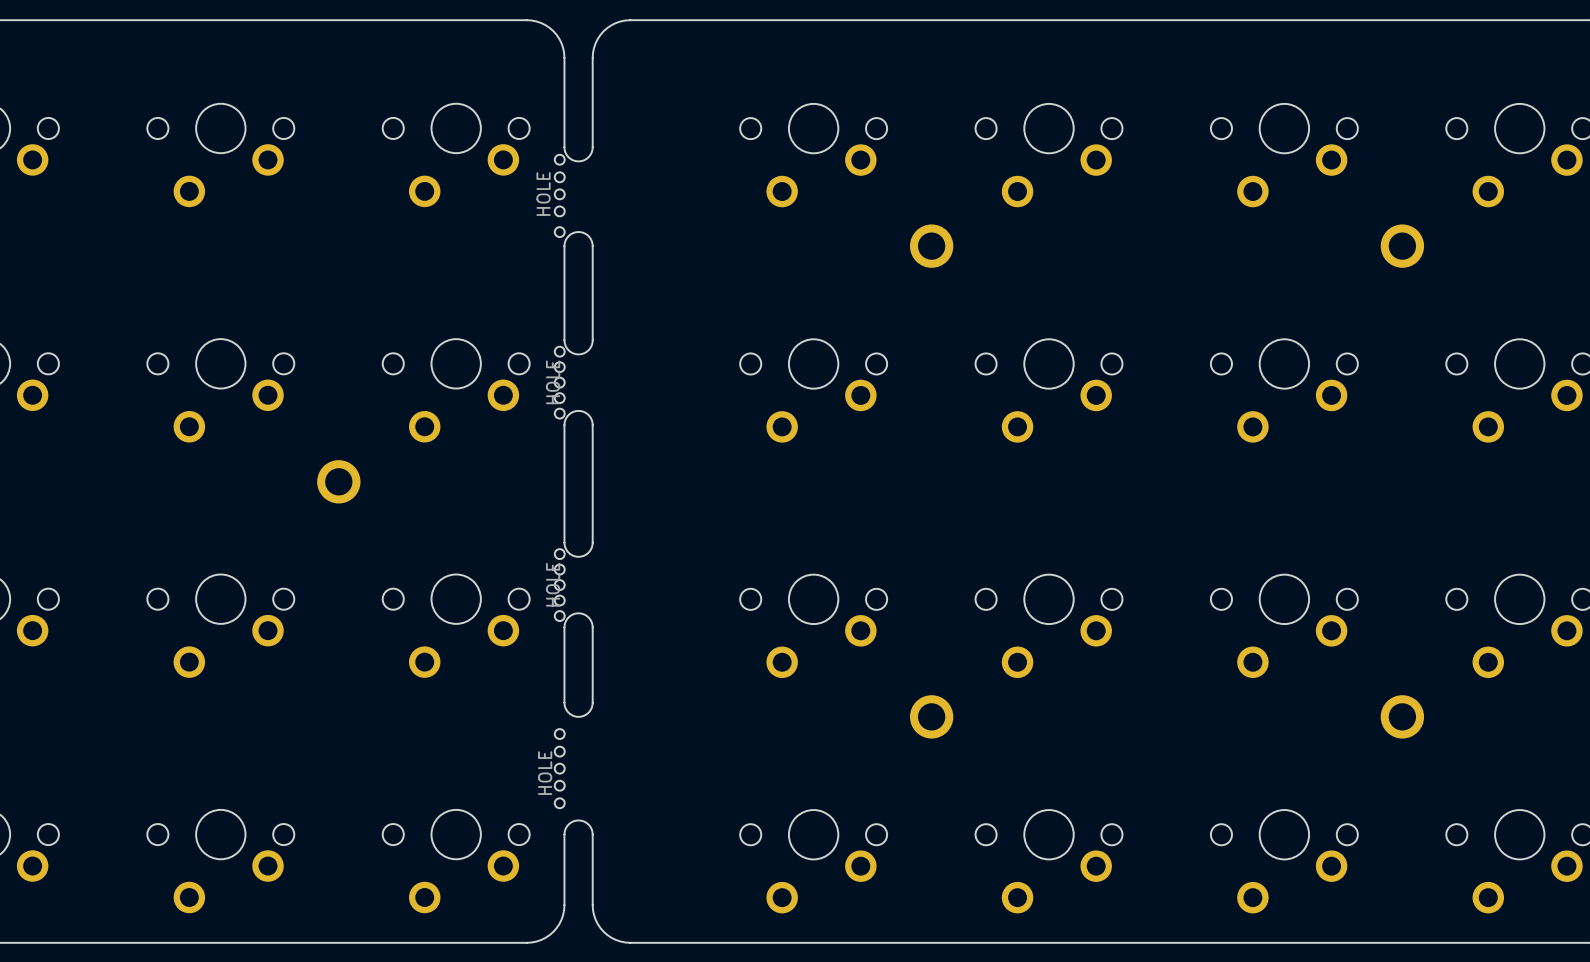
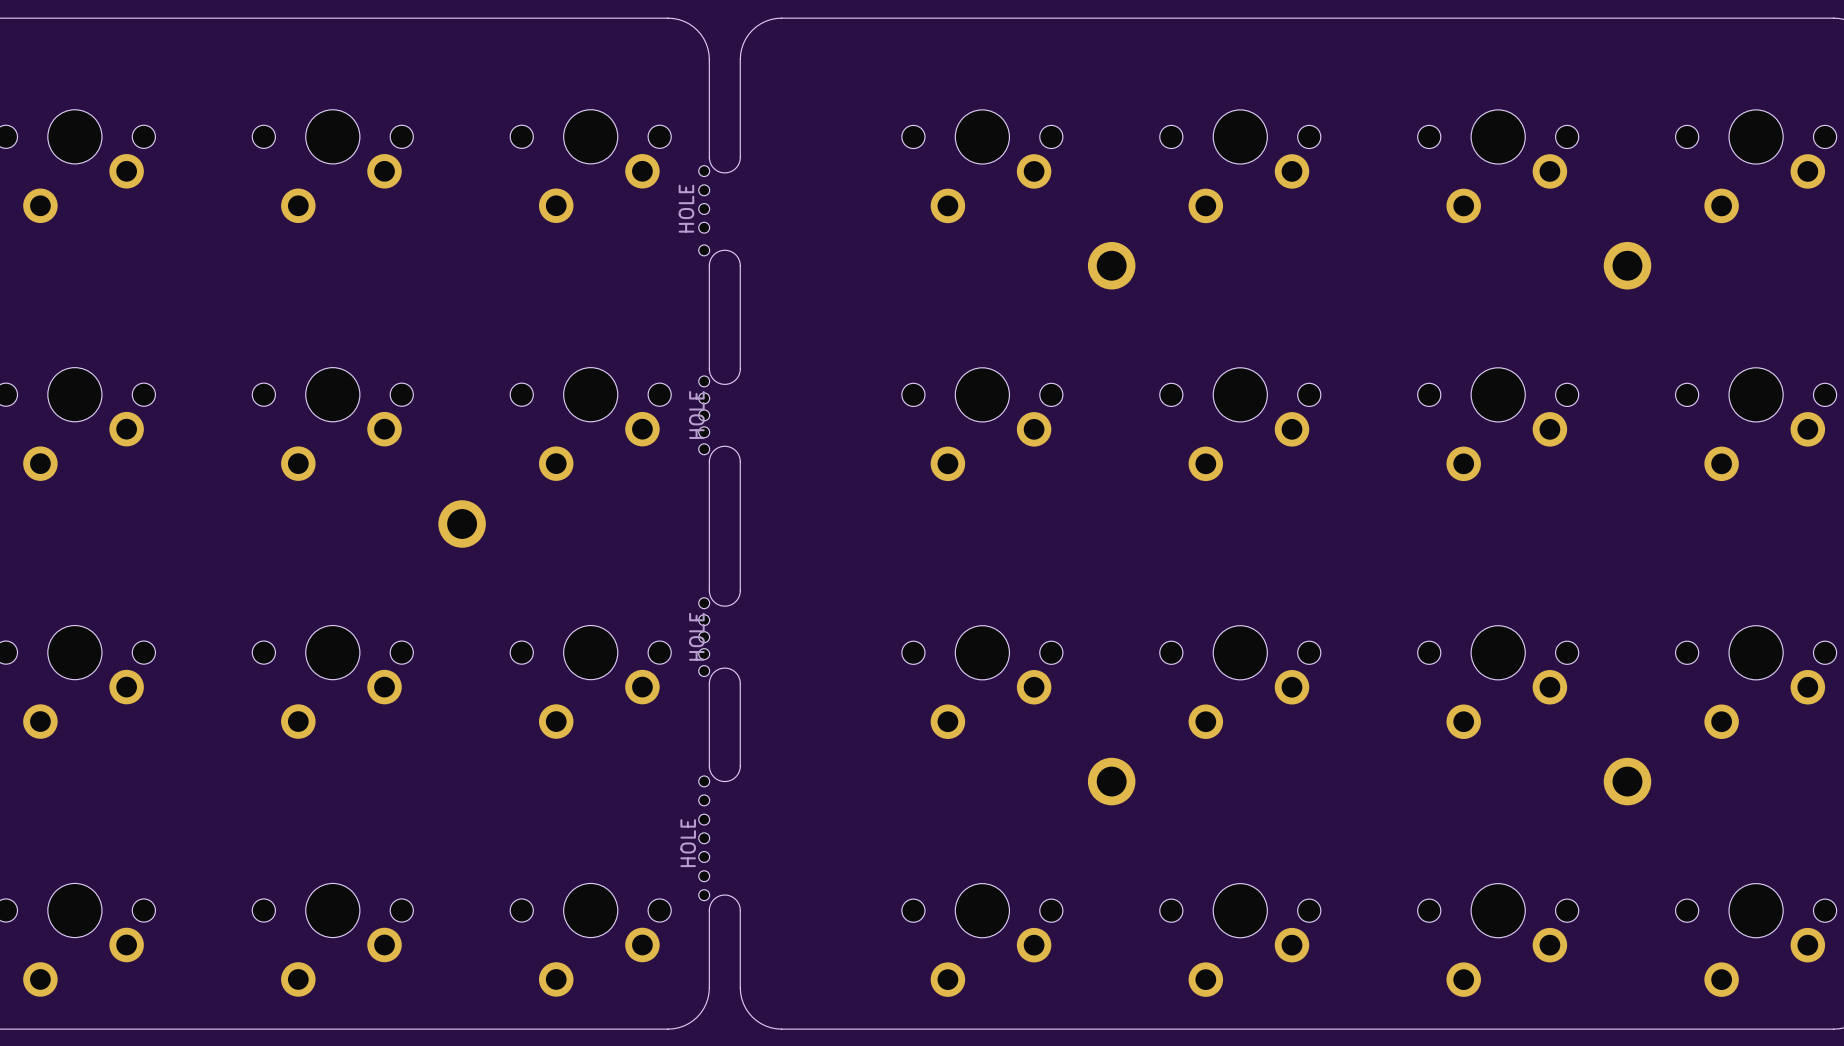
part footprint: [554, 729, 565, 809] -> [698, 775, 710, 901]

